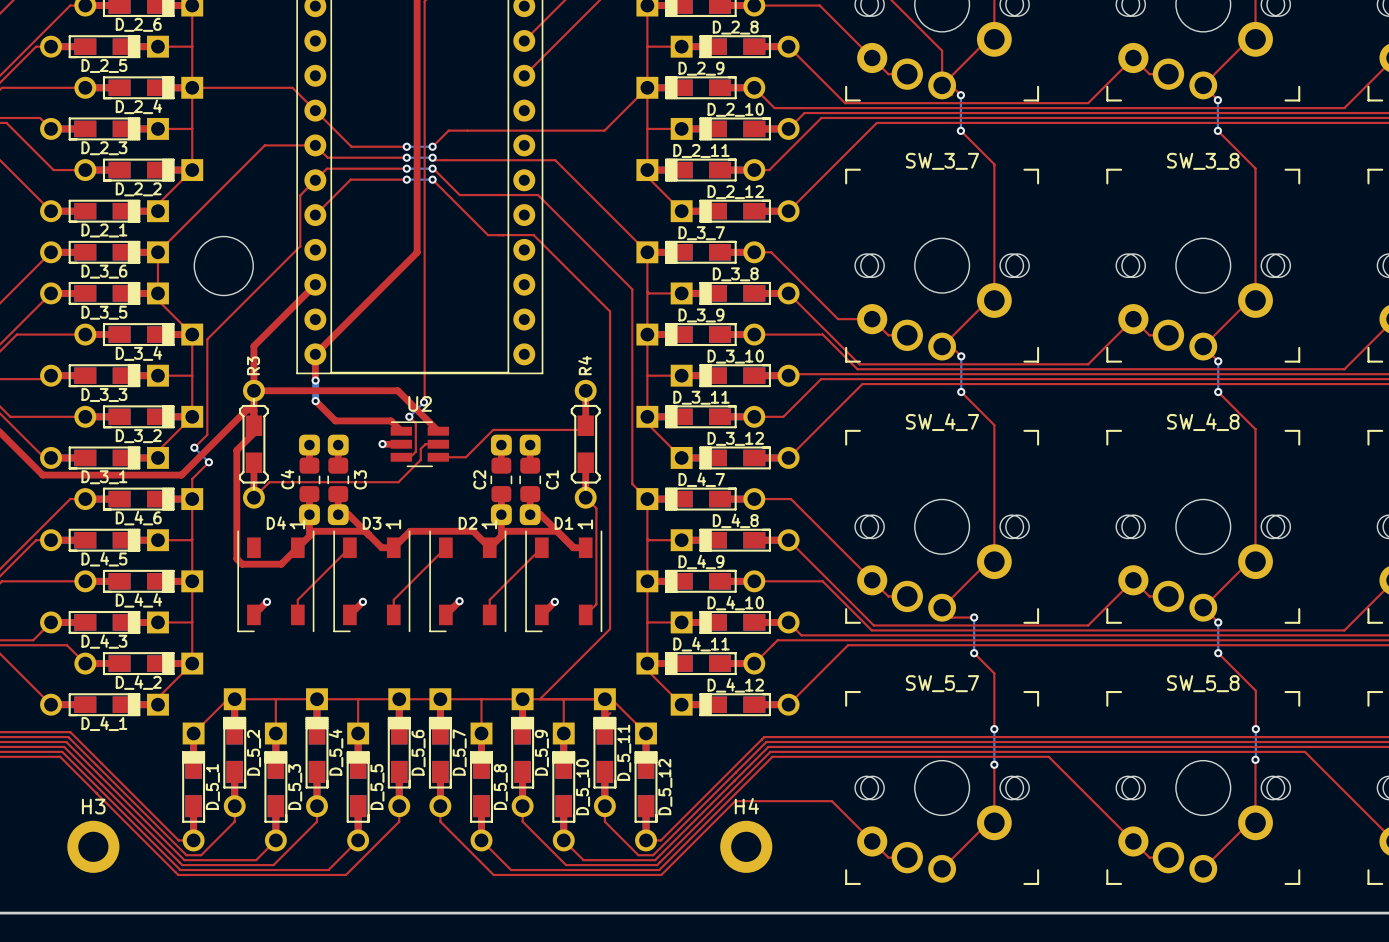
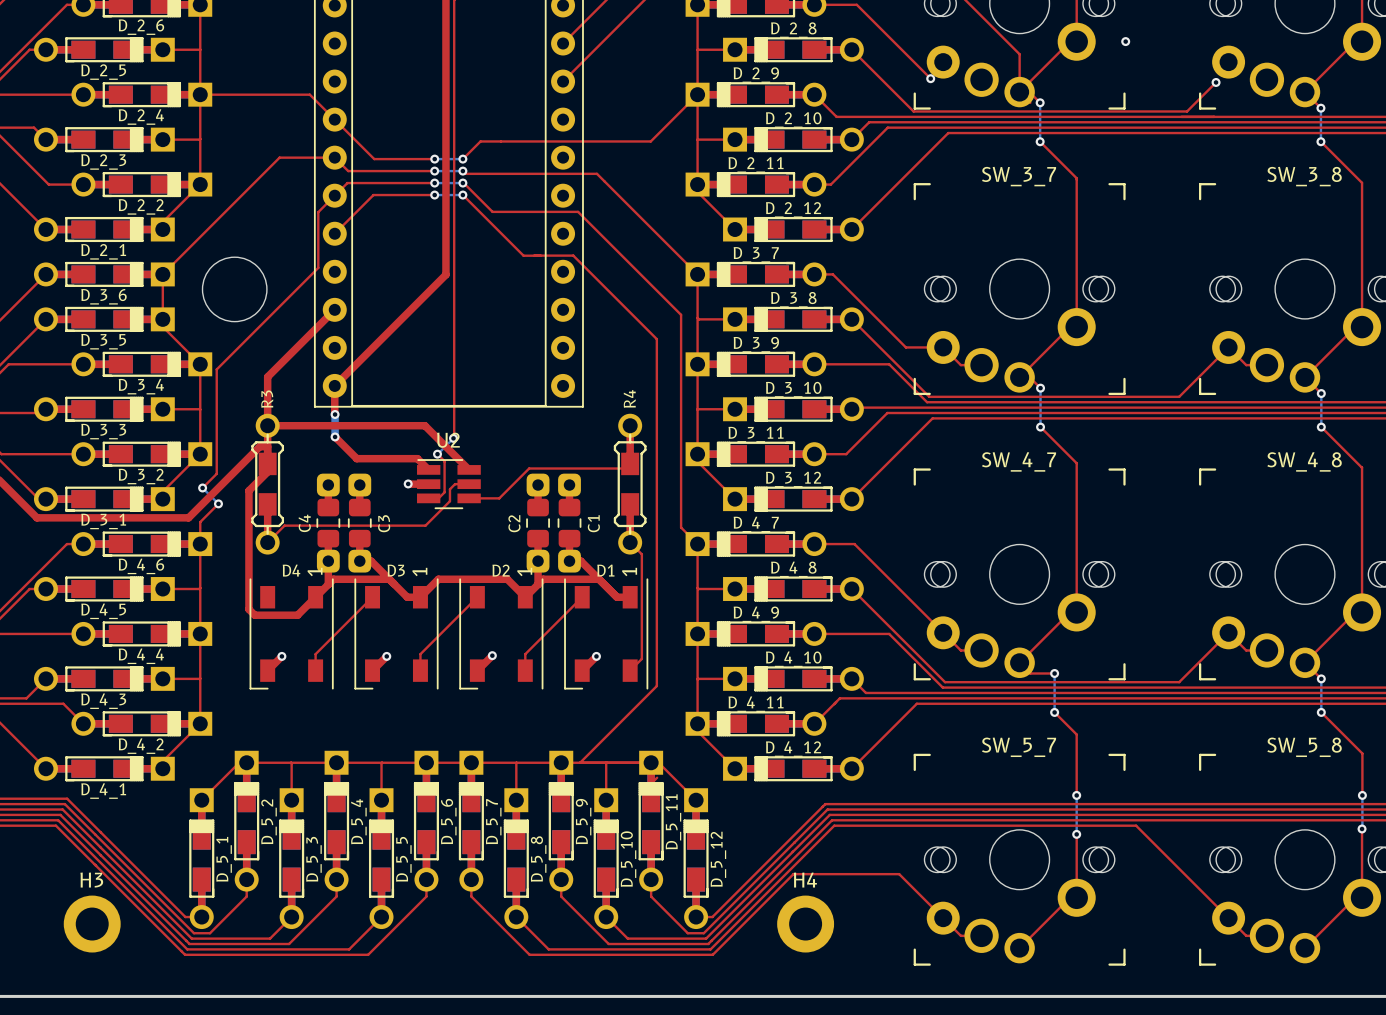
top track: (793, 5) (819, 5) (888, 74) (907, 74) -> (856, 4) (932, 80)
via: none -> (1125, 41)
via: none -> (930, 78)
top track: (1168, 74) (1149, 74) (1133, 57) (1088, 103) -> (1217, 80) (1187, 111) (1179, 111)
via: none -> (1216, 82)

